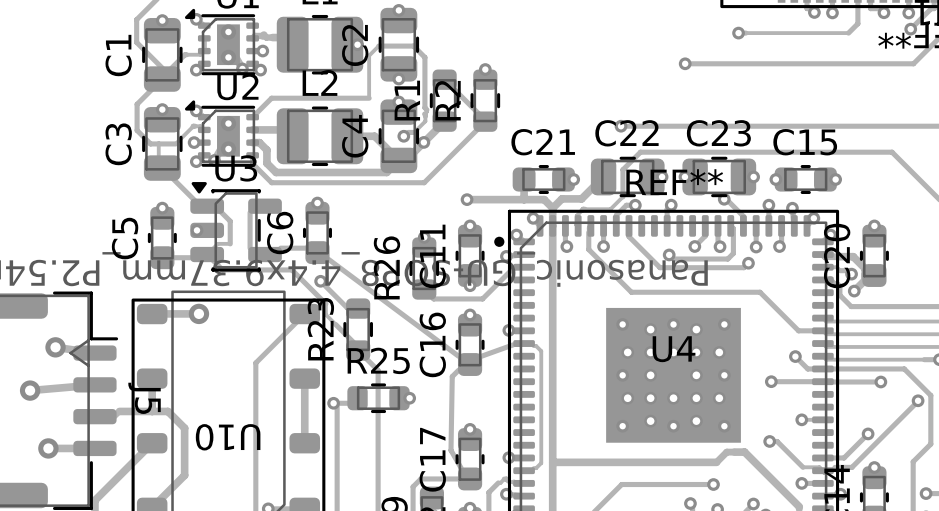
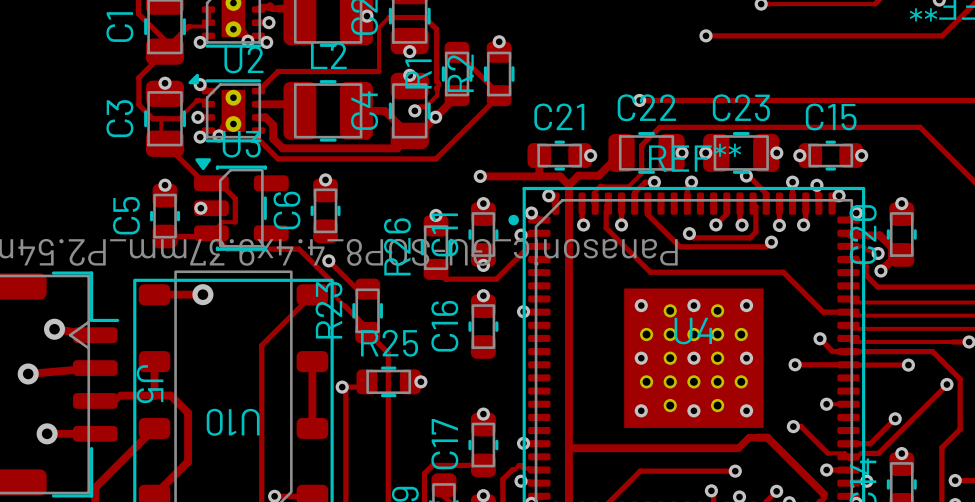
track: (250, 212) (250, 248) -> none
track: (280, 248) (306, 248) -> none
track: (328, 259) (458, 356) -> none
track: (513, 344) (481, 356) -> none
track: (533, 346) (541, 351) (541, 463) (533, 468) -> none
track: (458, 370) (452, 376) (450, 450) (461, 468) -> none
via: none -> (693, 358)

